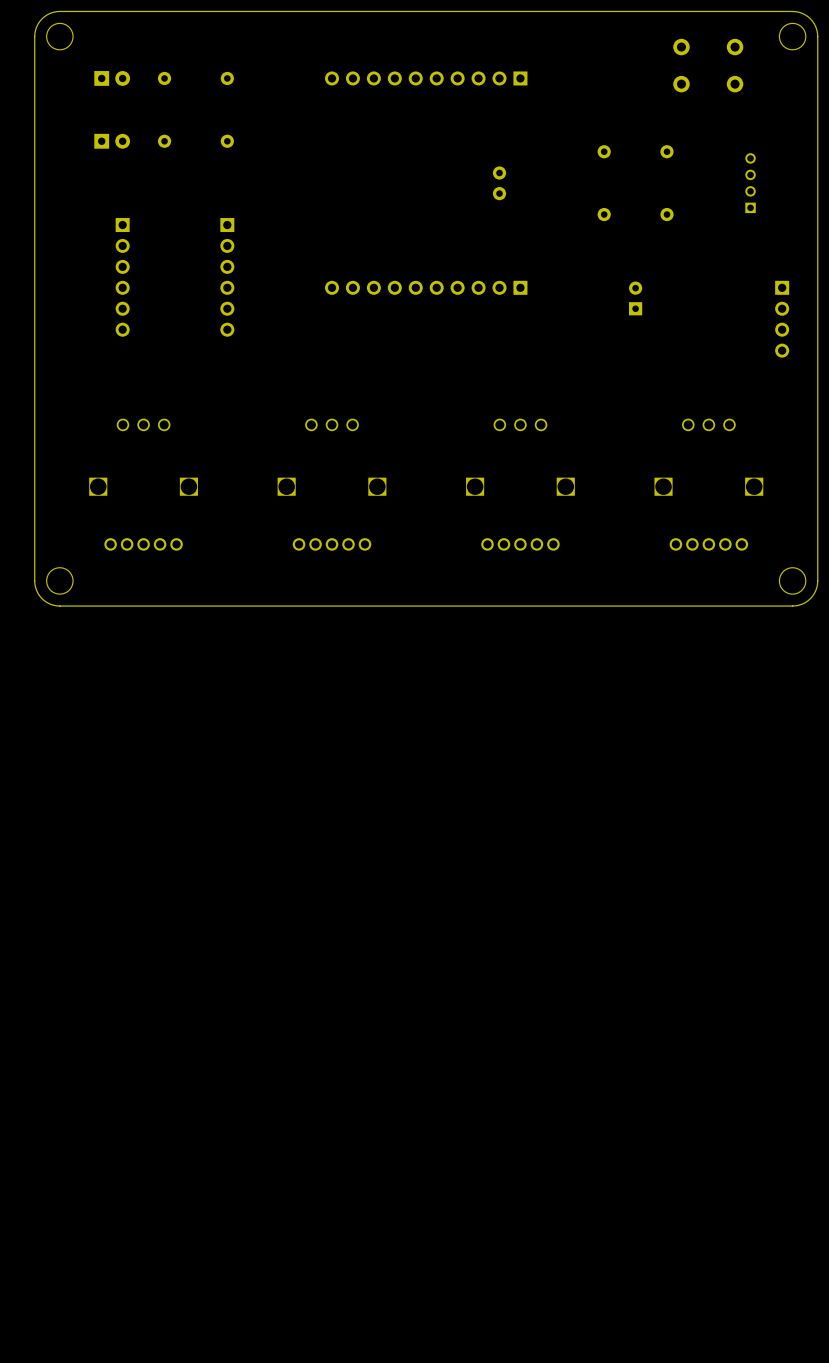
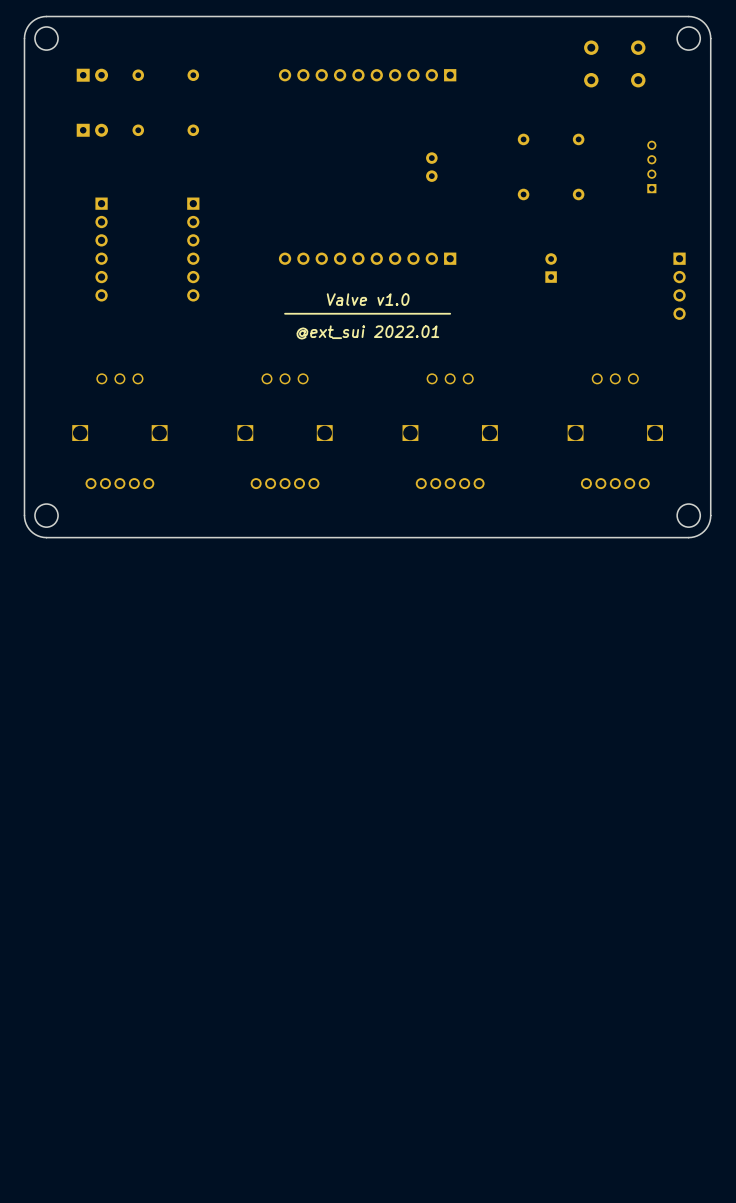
text: none -> Valve v1.0 (368, 299)
line: none -> (450, 313) (285, 313)
text: none -> @ext_sui 2022.01 (367, 332)

